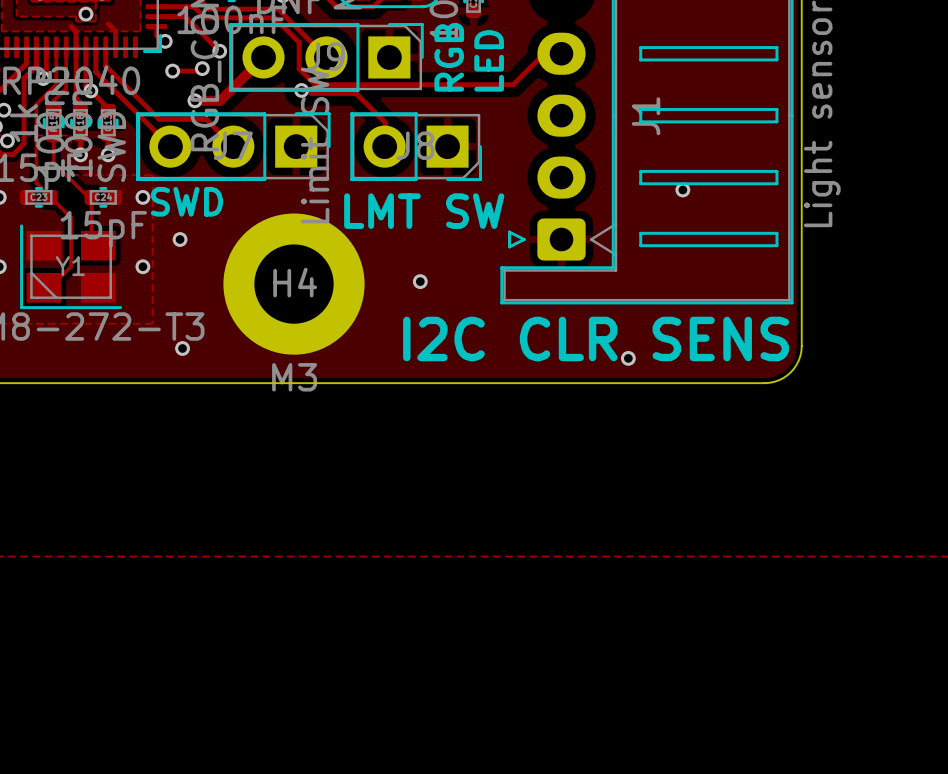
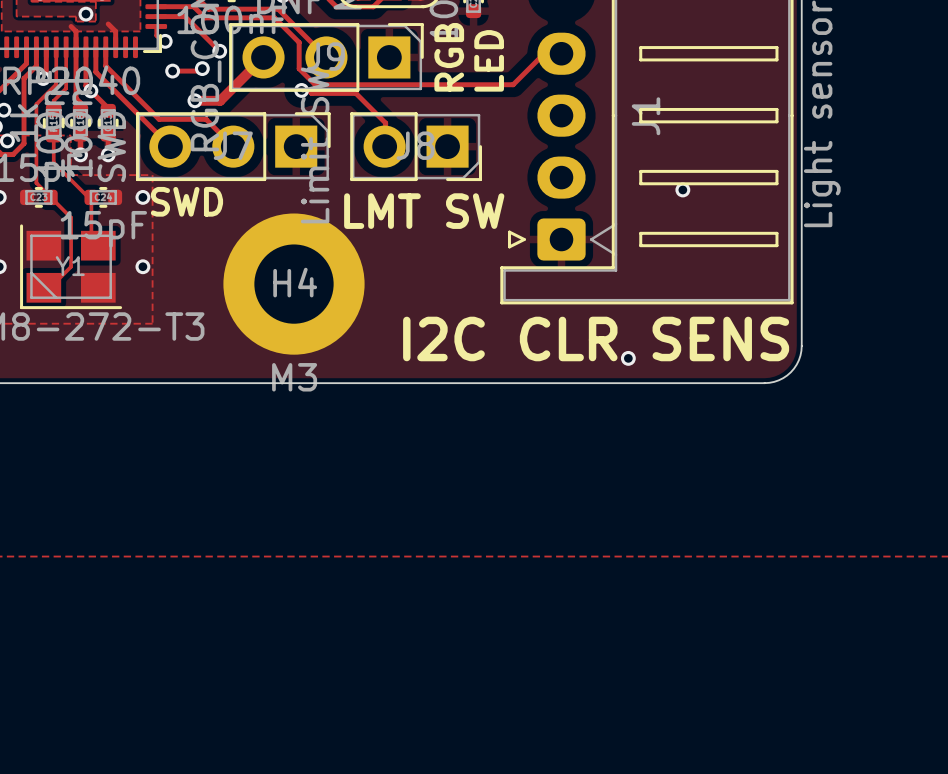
via: (180, 239) -> none
via: (420, 281) -> none
via: (182, 348) -> none

